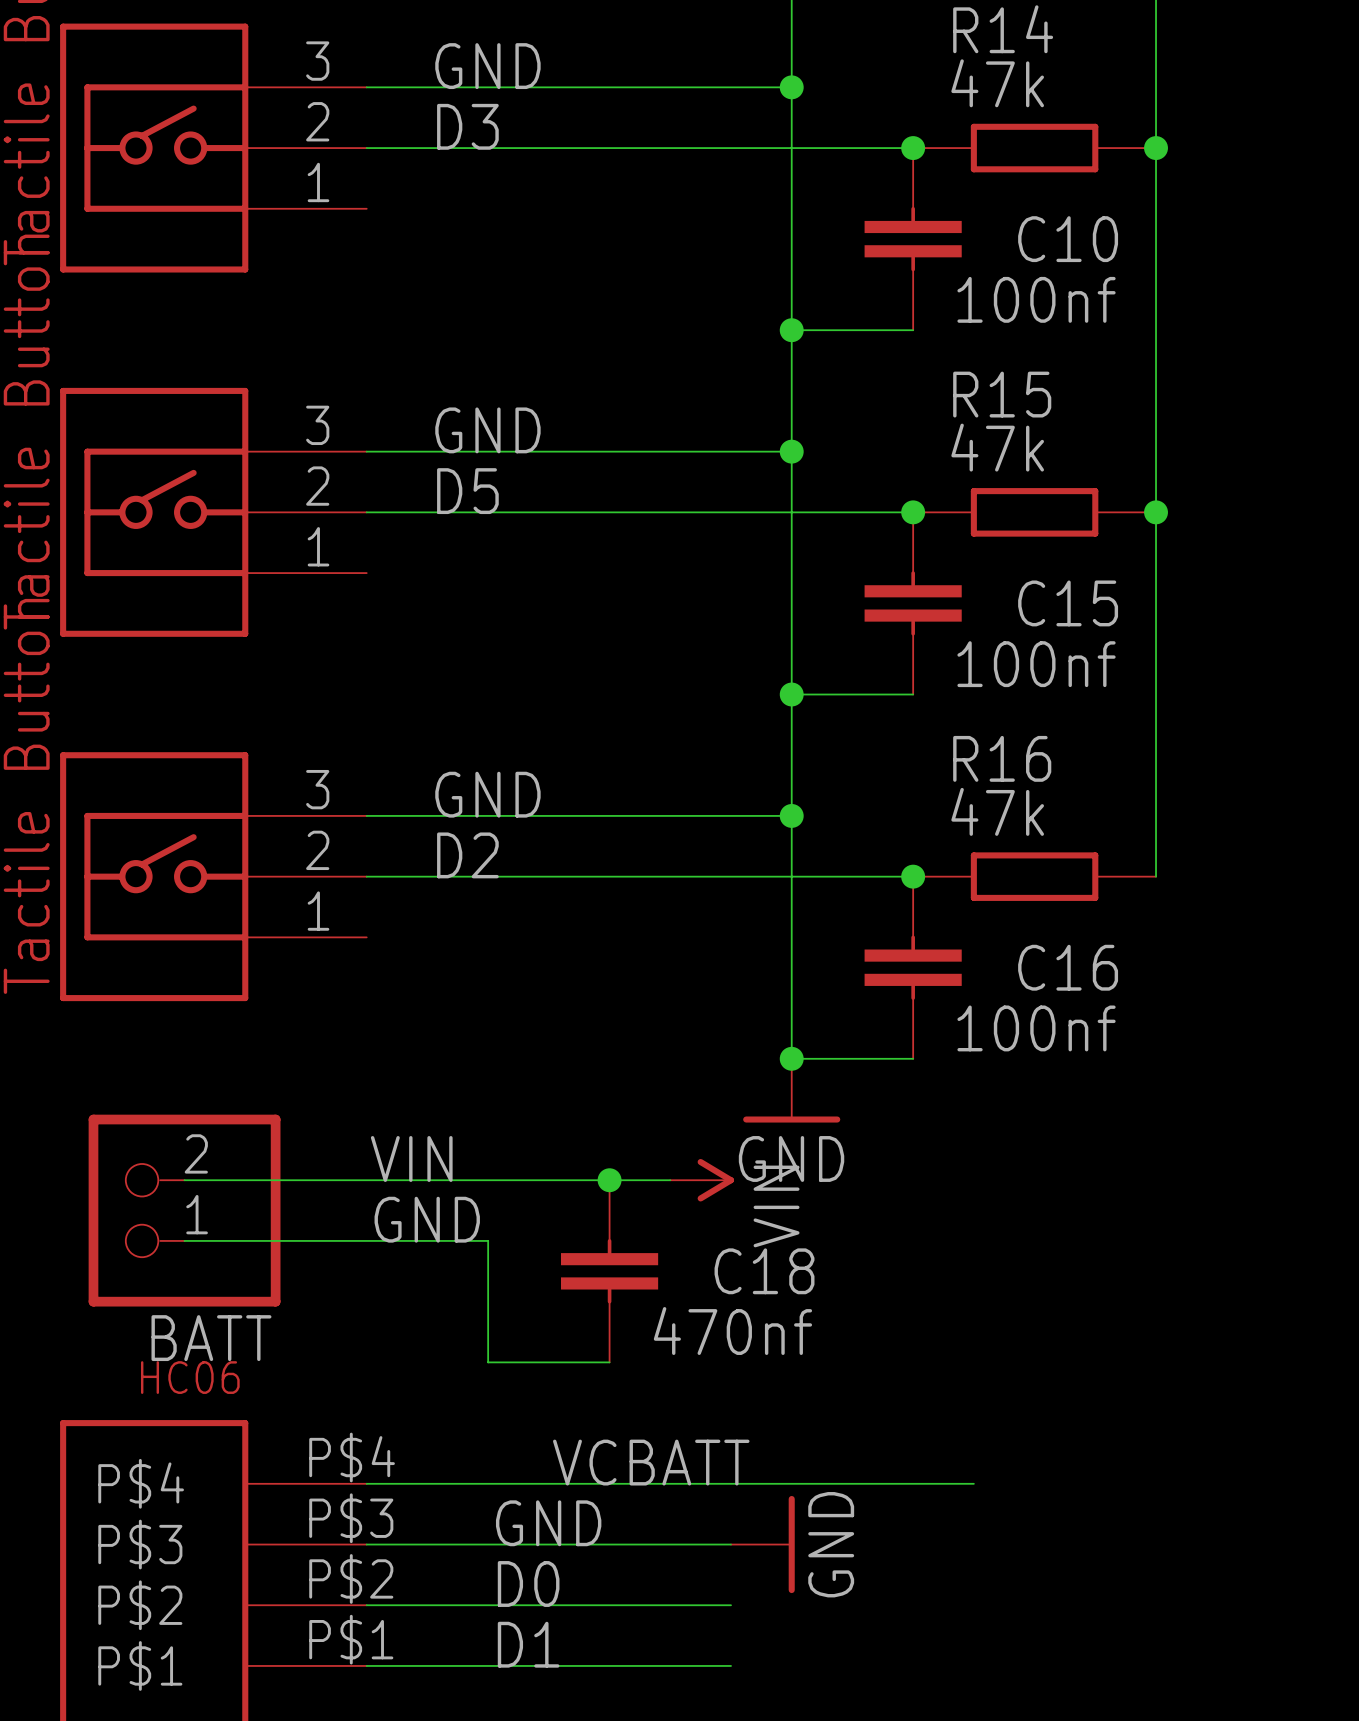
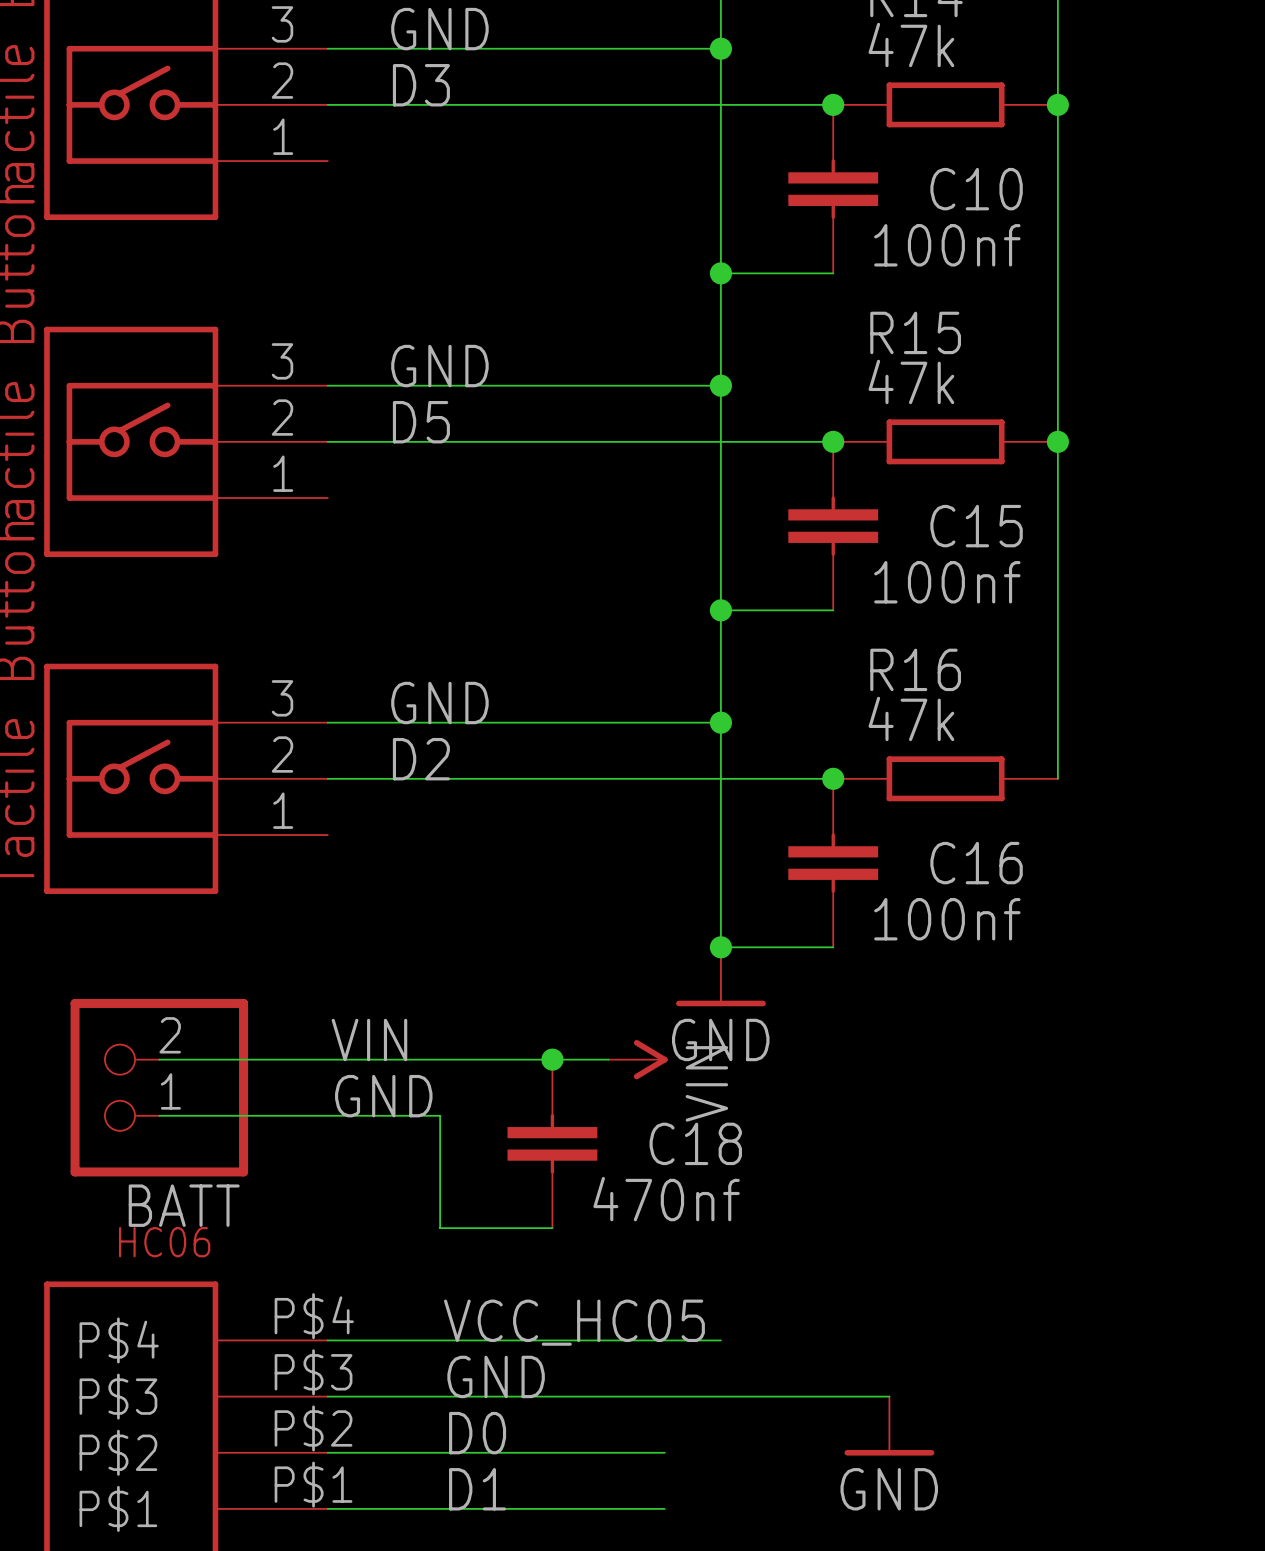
label: VCBATT (651, 1462) -> none
label: none -> VCC_HC05 (574, 1322)
wire: (791, 1483) (973, 1483) -> none
wire: none -> (664, 1396) (889, 1396)
power symbol position: GND (762, 1544) -> GND (889, 1426)
power symbol rotation: 0° (791, 1544) -> 90° clockwise (889, 1452)

